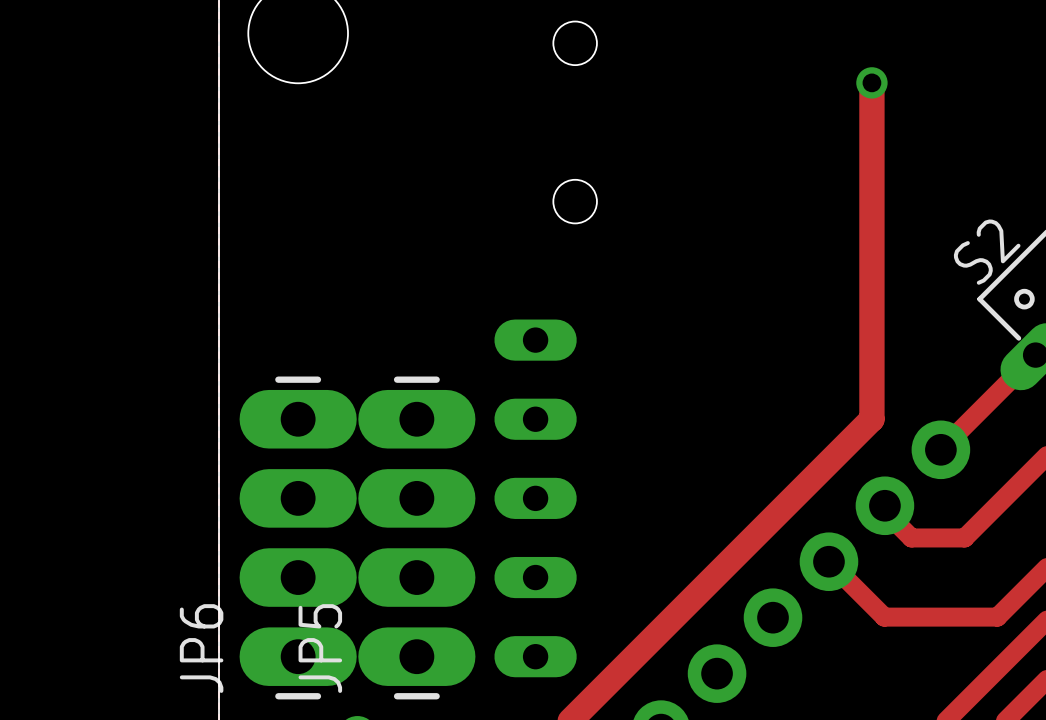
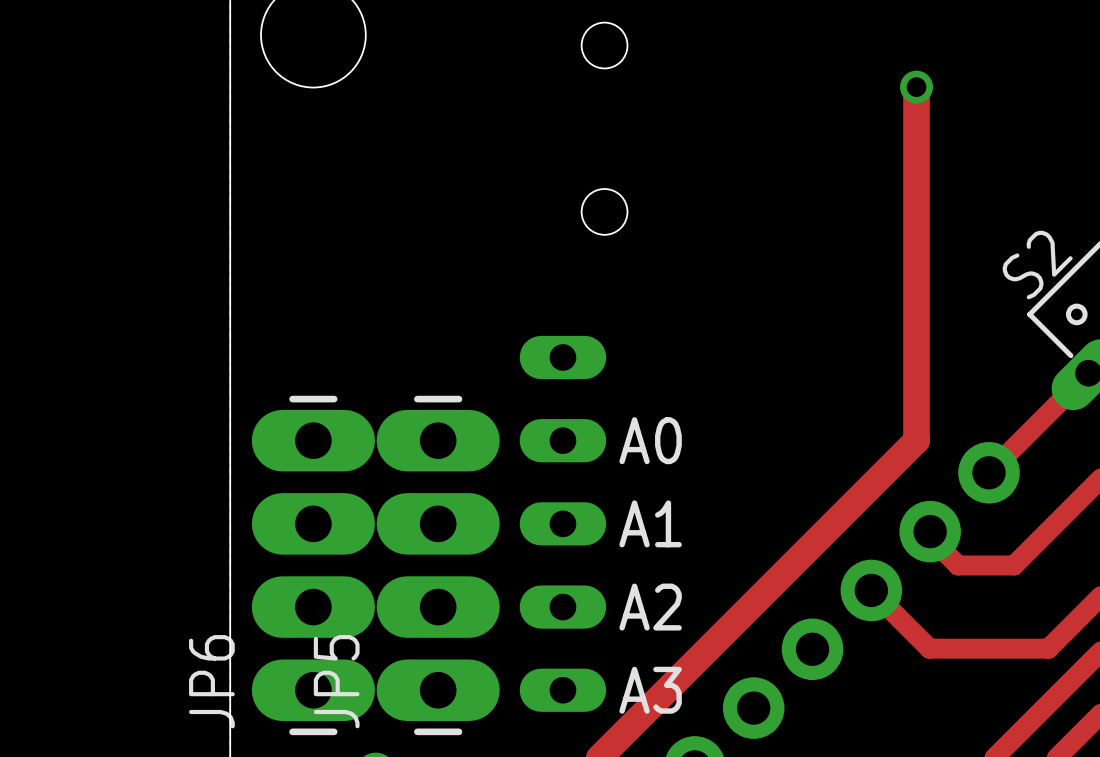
text: none -> A0 (650, 440)
text: none -> A1 (650, 523)
text: none -> A2 (650, 607)
text: none -> A3 (650, 690)

